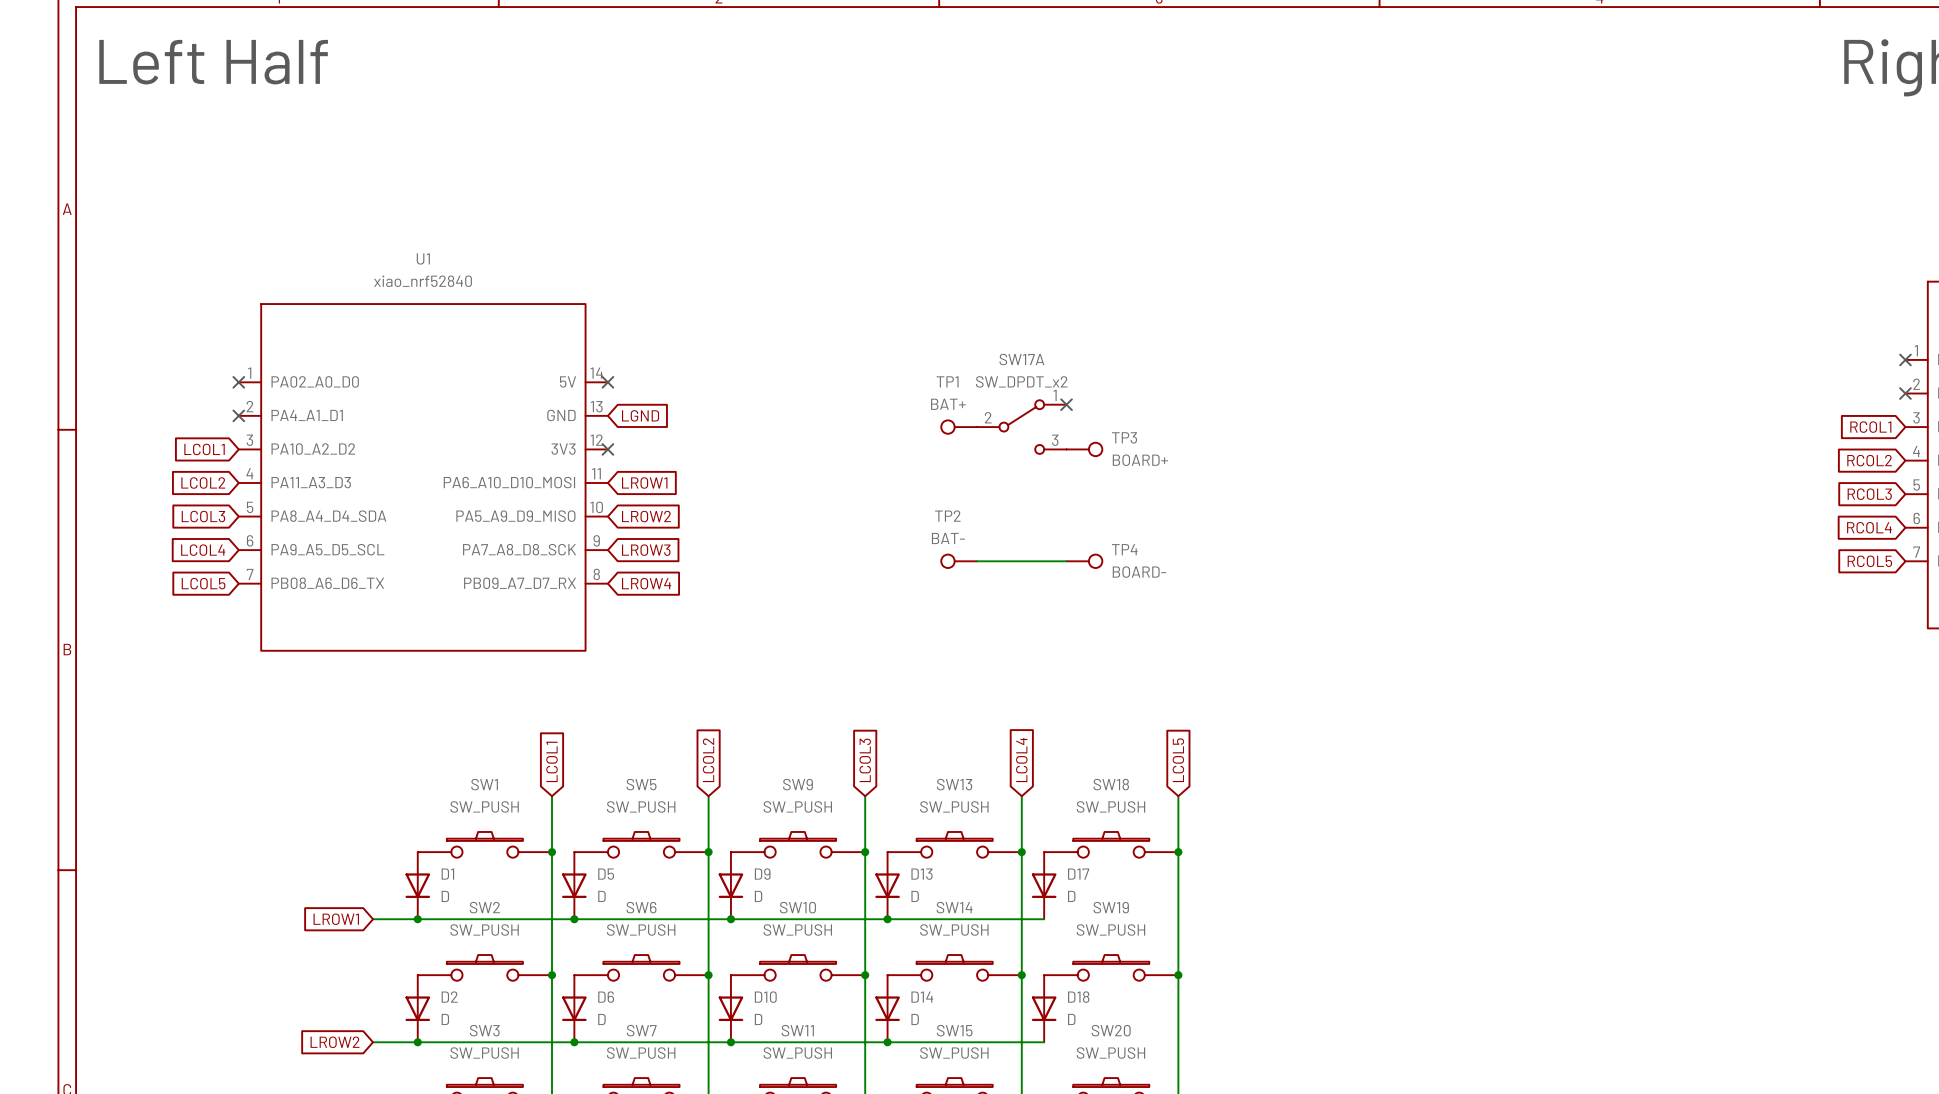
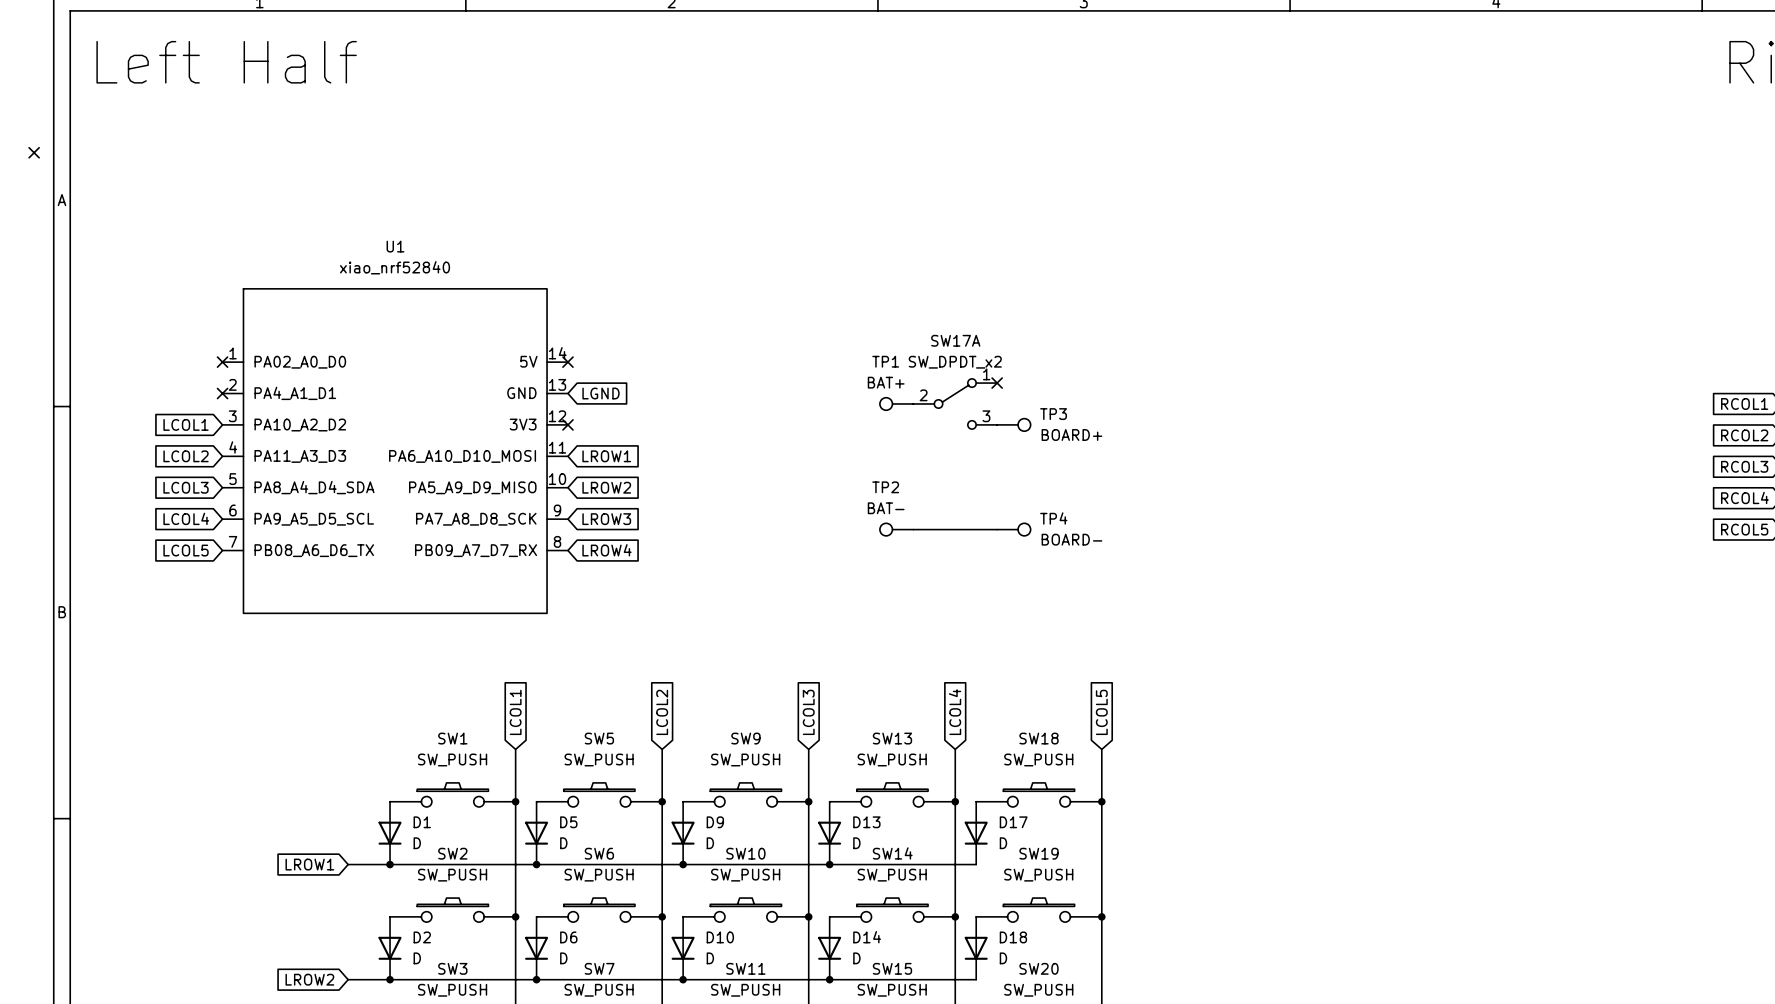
no-connect mark: none -> (34, 152)

